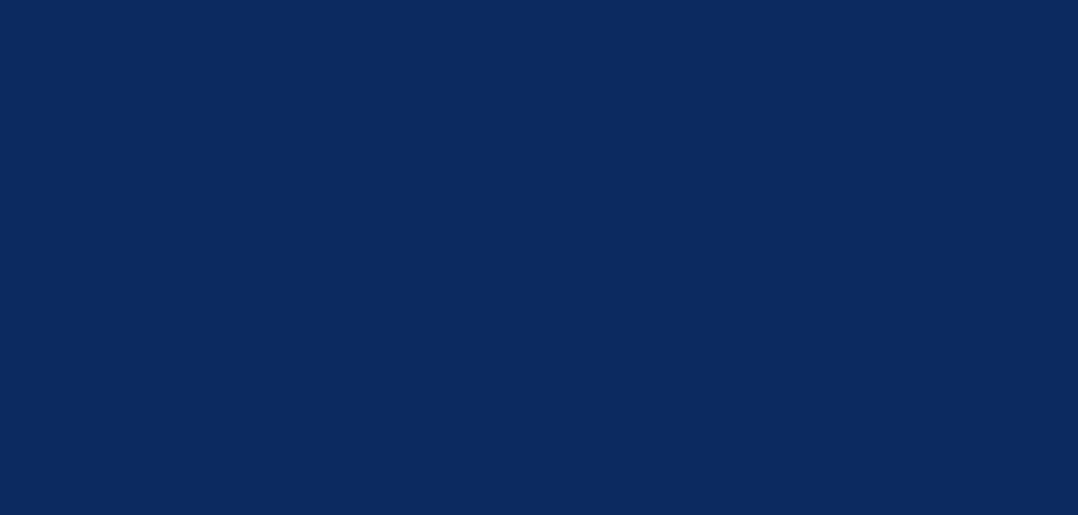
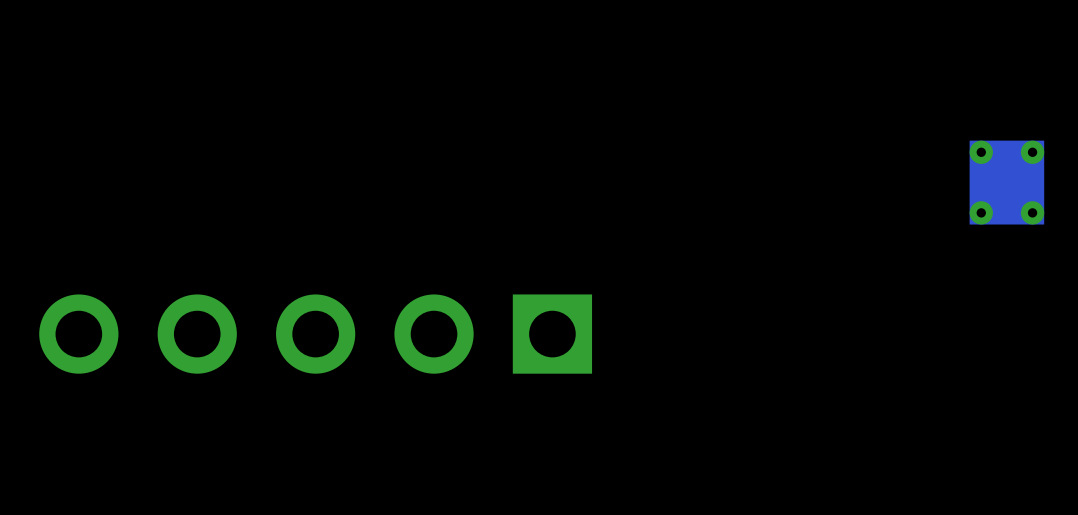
part: none -> (1006, 182)
part: none -> (315, 334)

